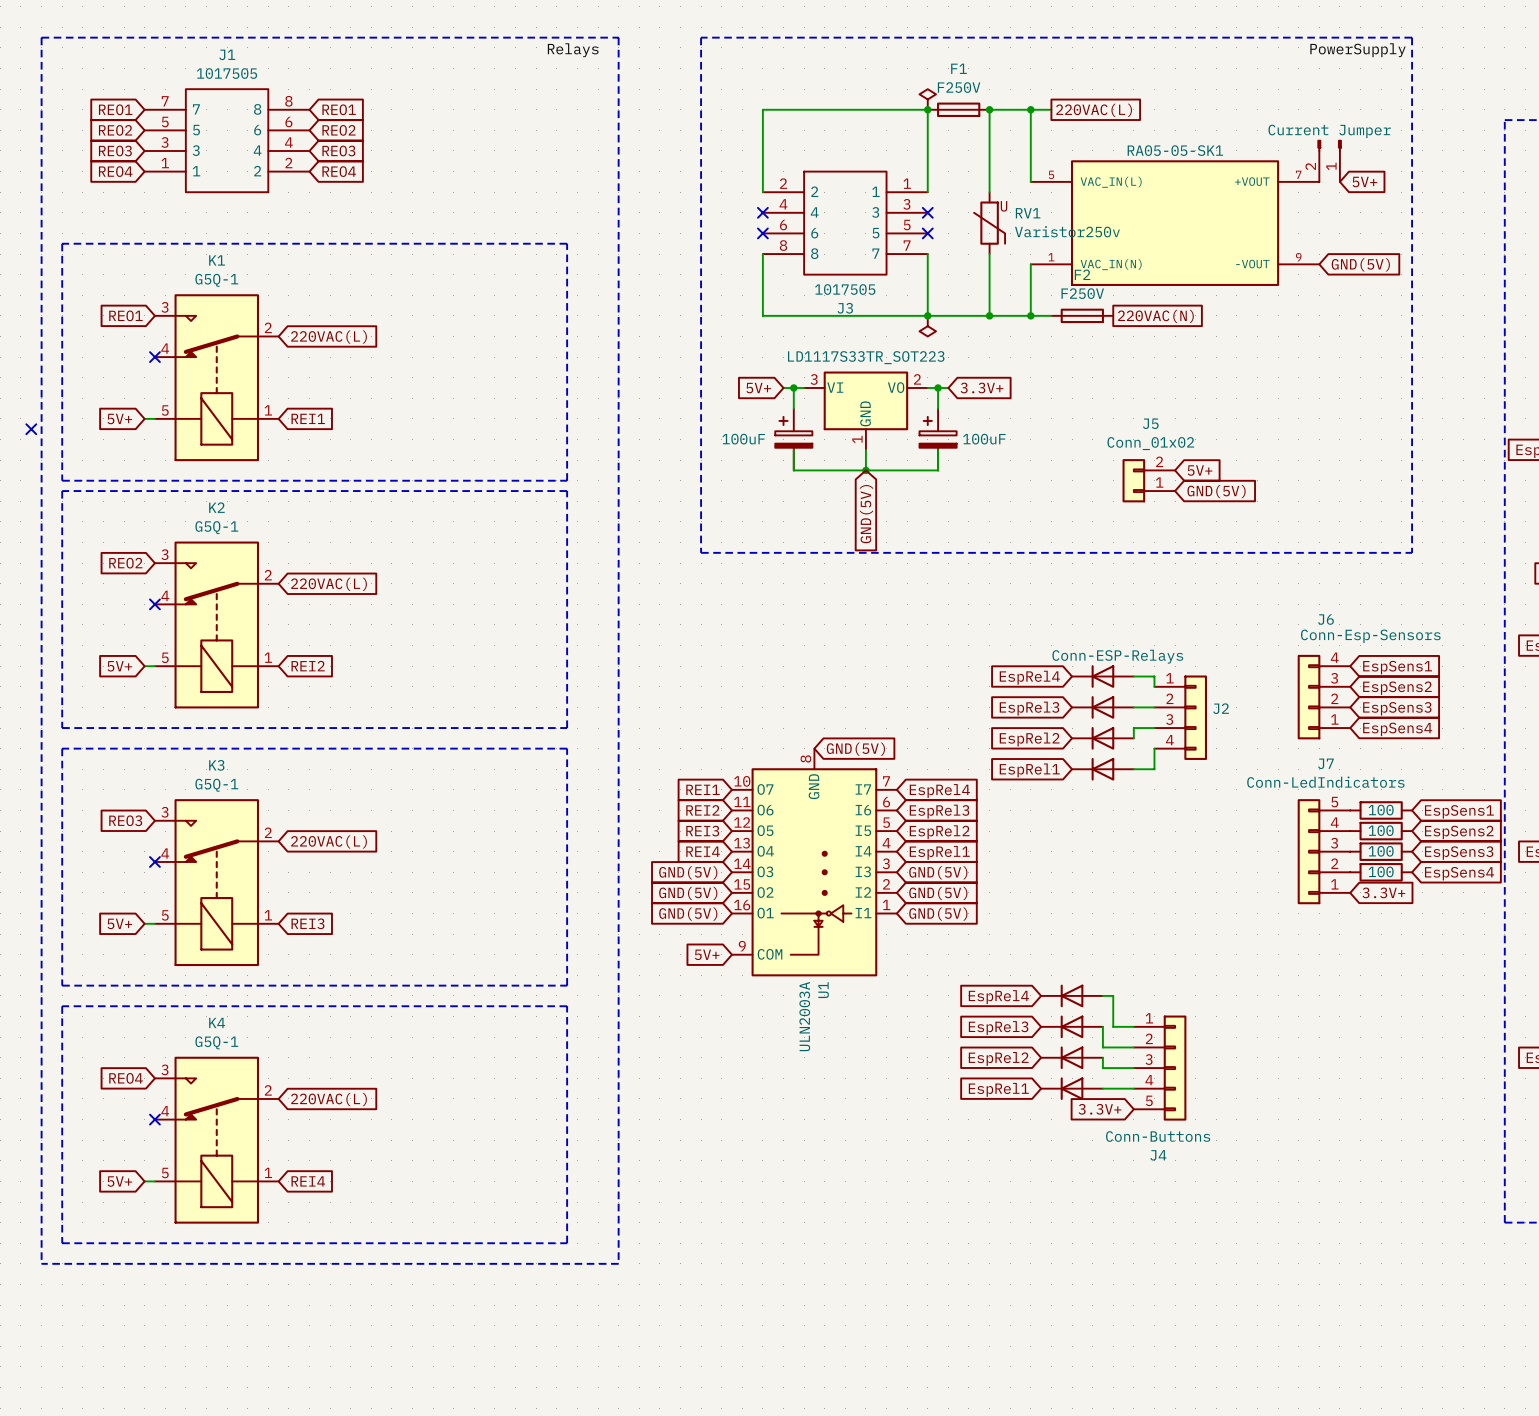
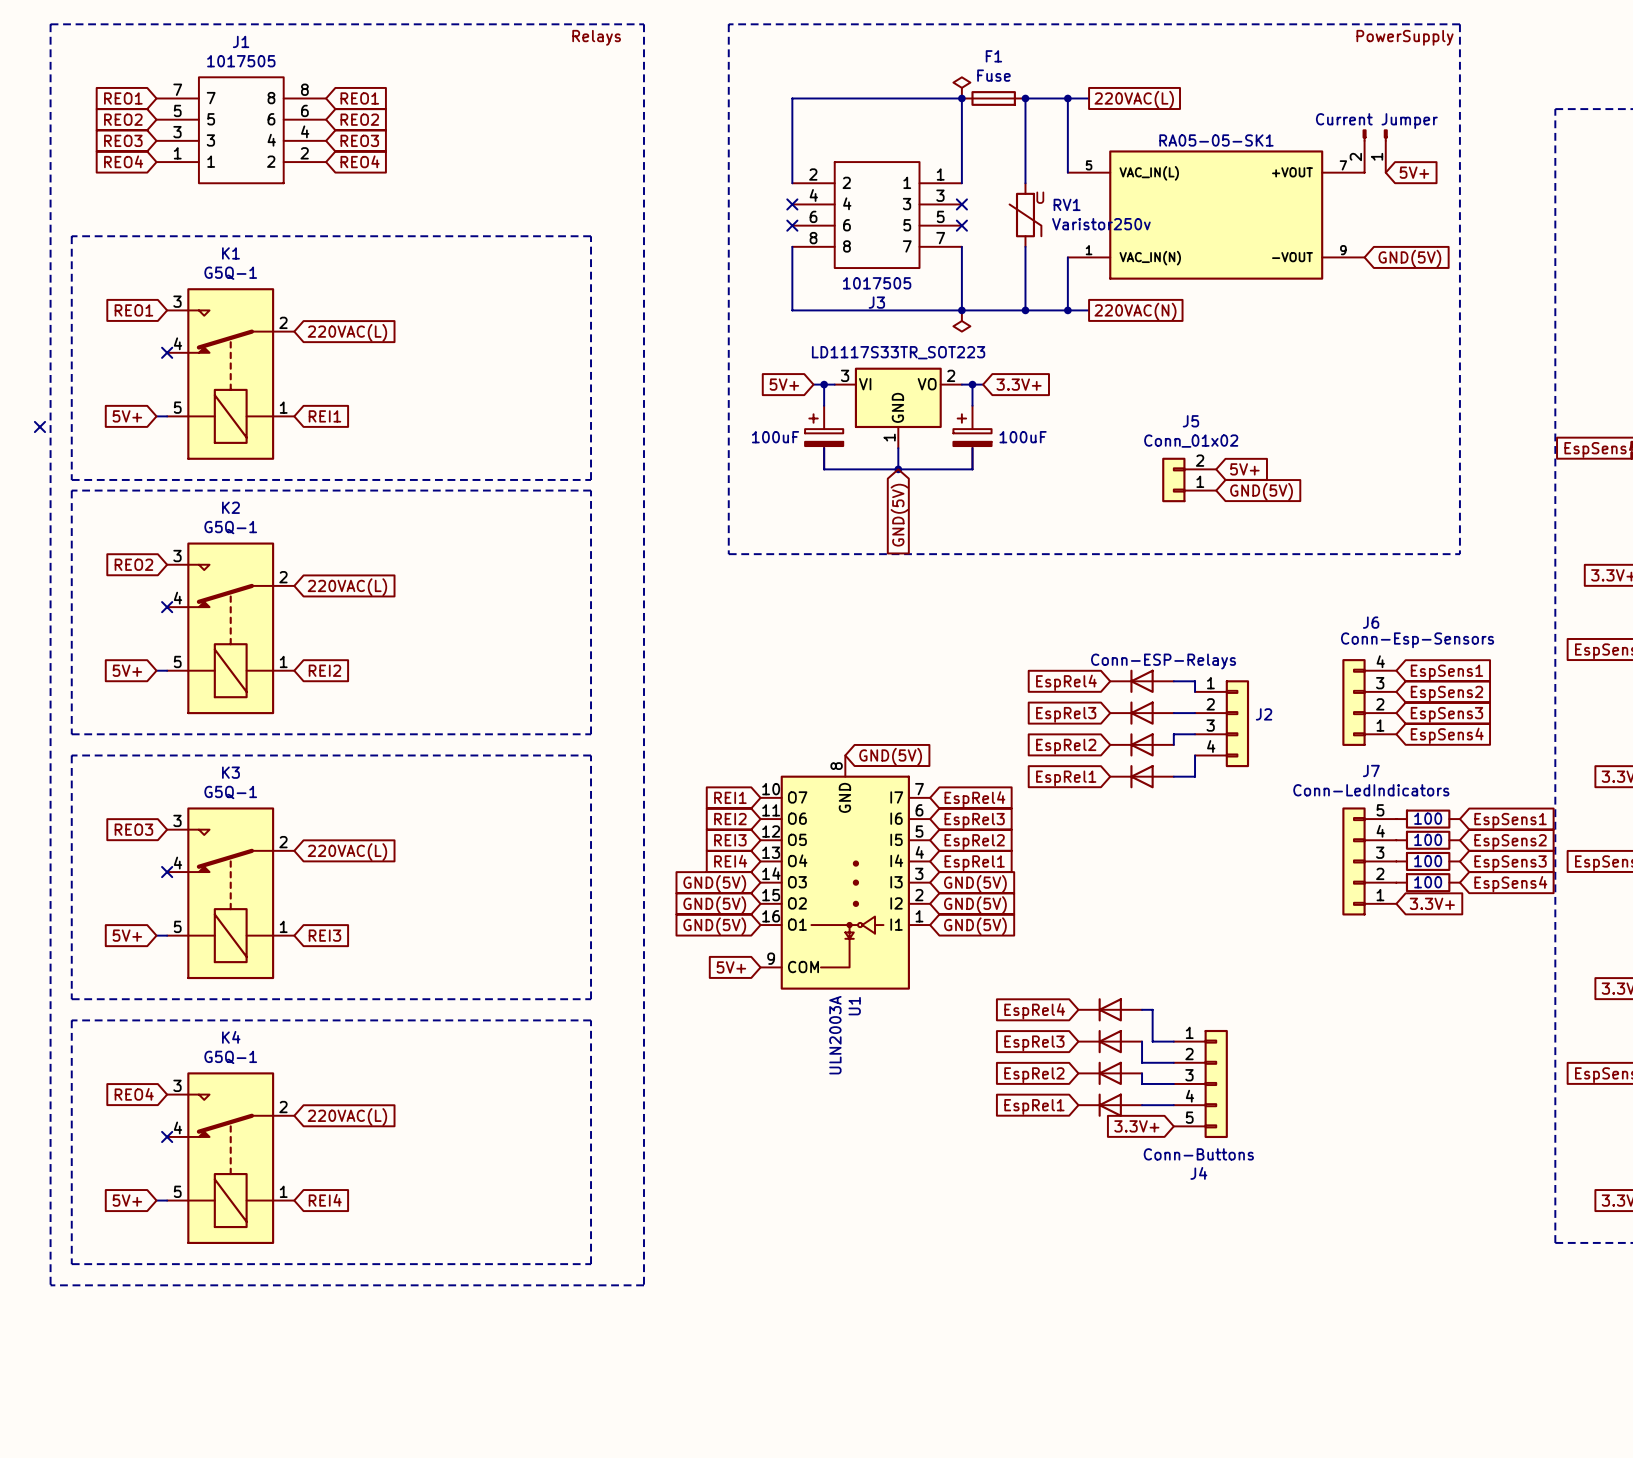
F1 value: F250V (959, 87) -> Fuse (993, 75)
F2: F250V (1082, 315) -> none
global label position: 220VAC(N) (1155, 316) -> 220VAC(N) (1135, 311)

